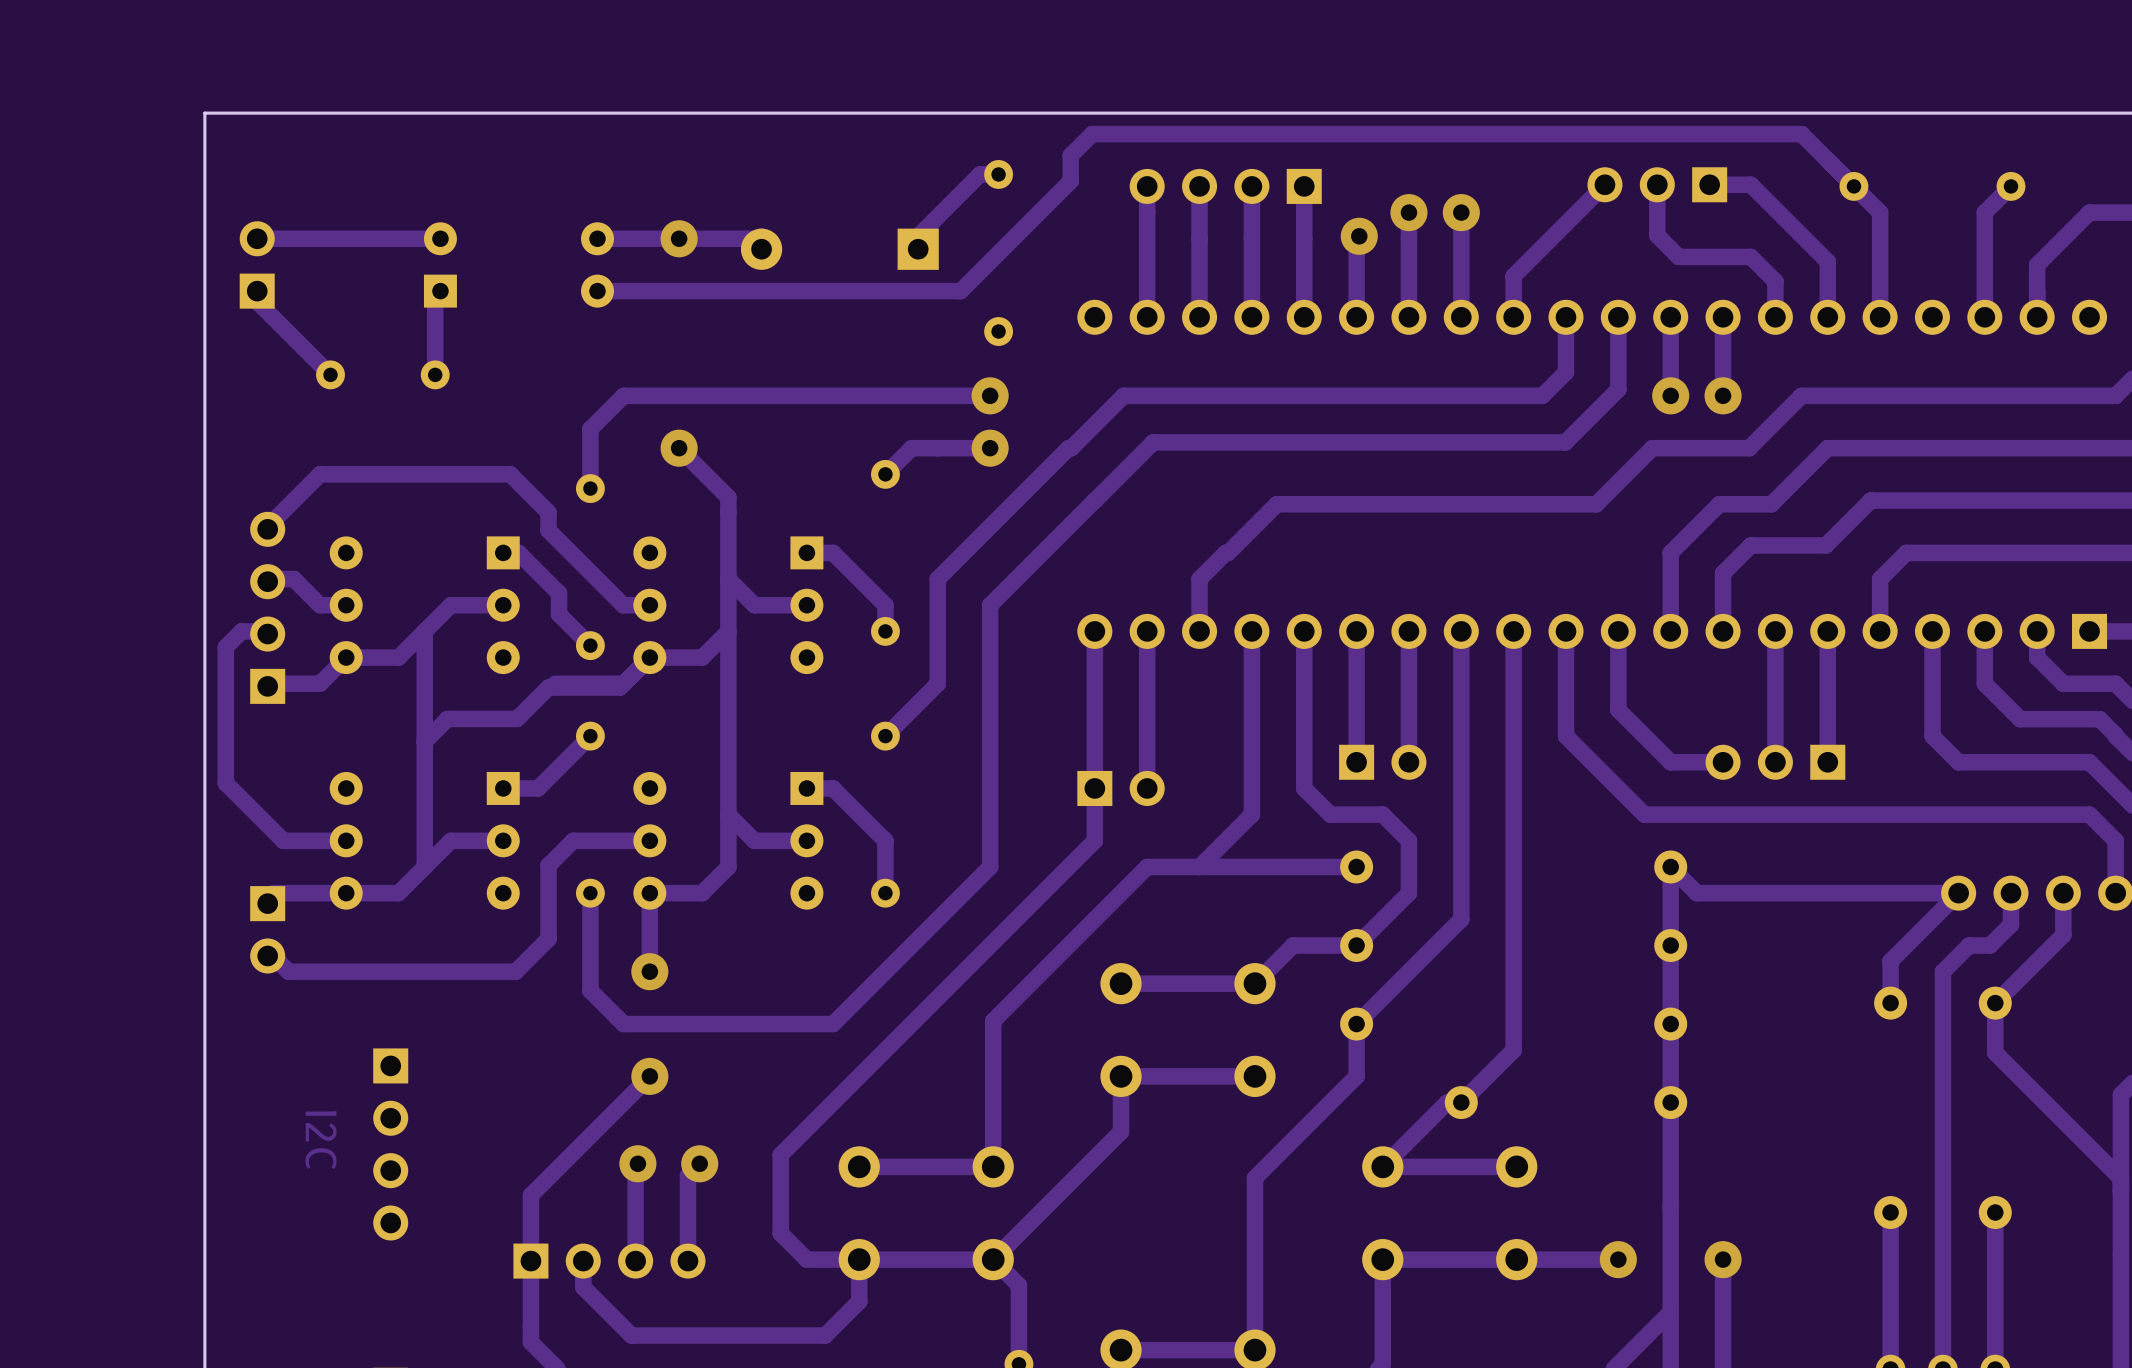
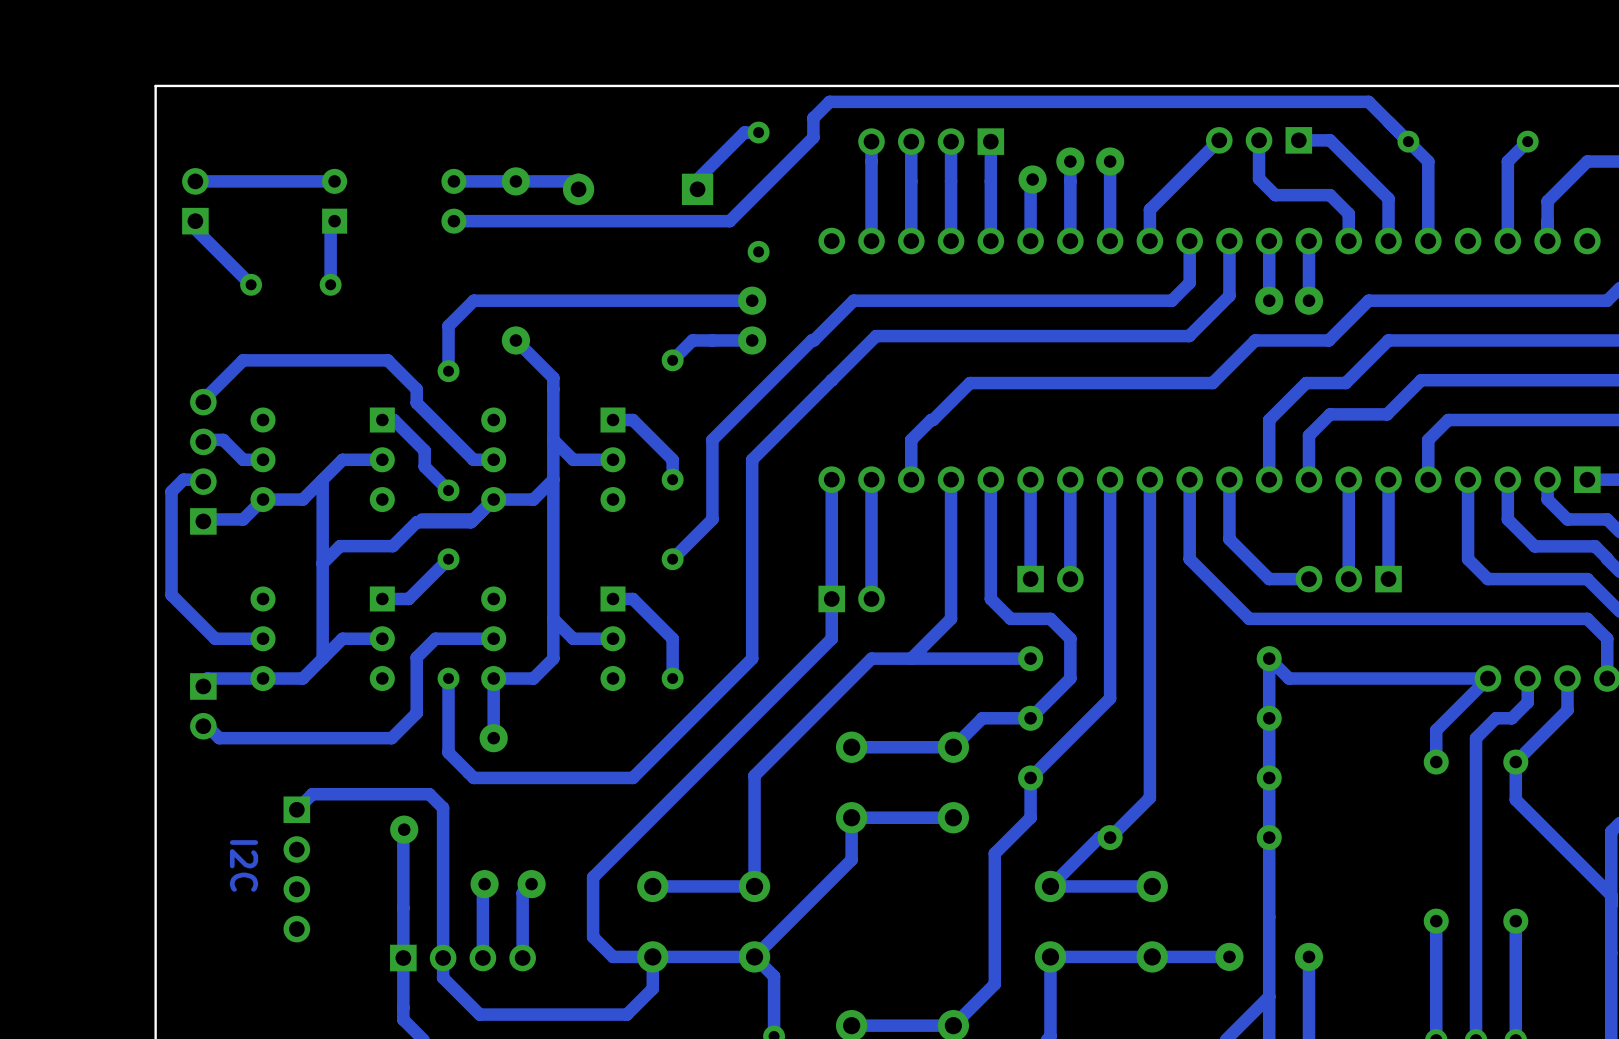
track: none -> (296, 809) (312, 794) (429, 794) (443, 807) (443, 958)
track: (649, 1076) (530, 1195) -> (403, 832) (403, 908)
via position: (649, 1076) -> (404, 829)
track: (1309, 1123) (1254, 1178) (1254, 1350) -> (994, 853) (994, 984) (953, 1025)

